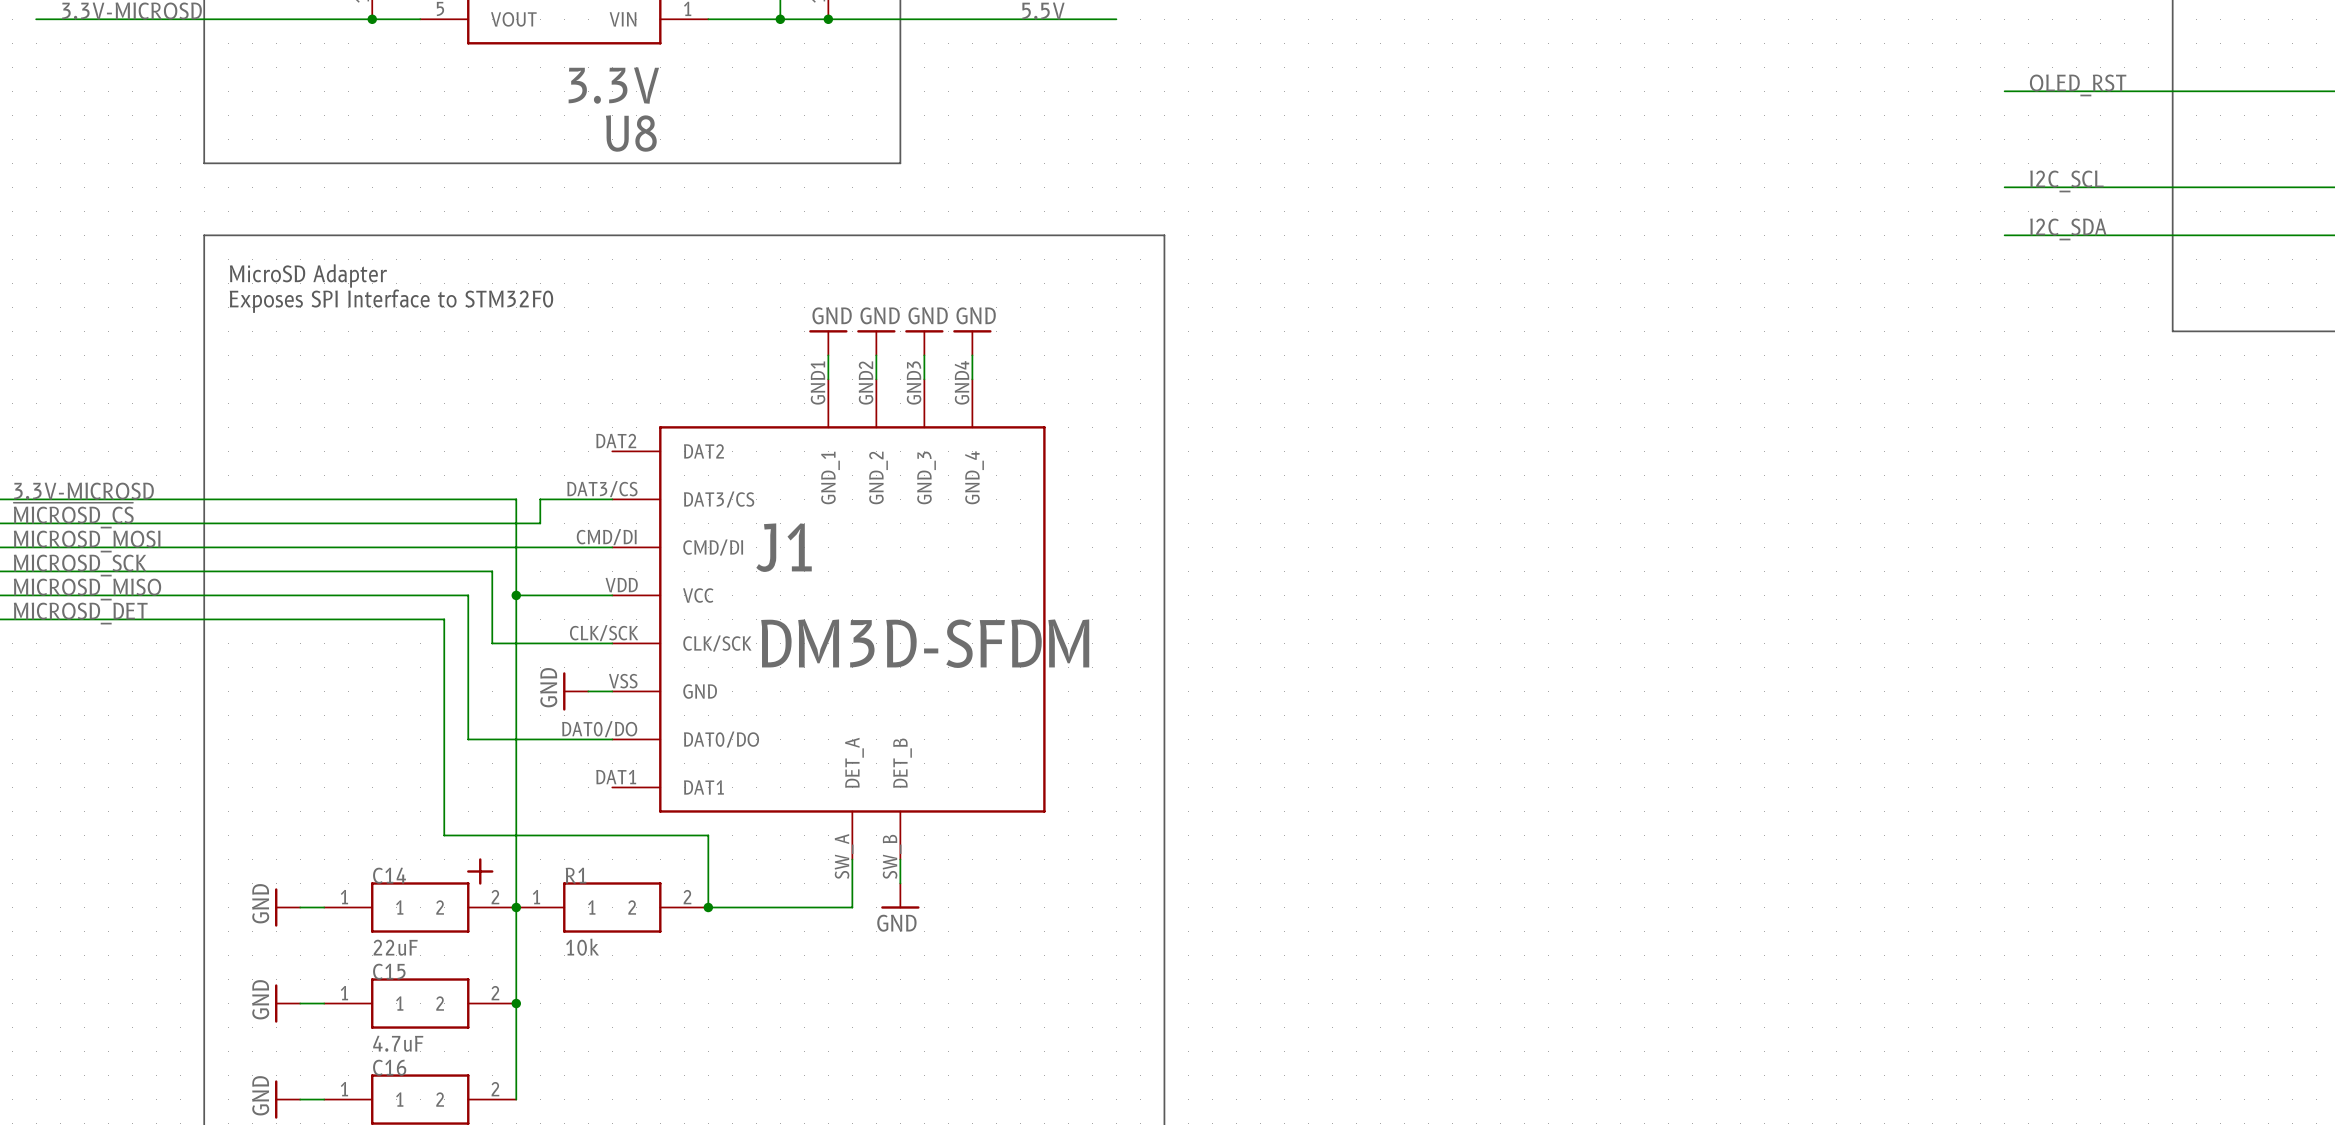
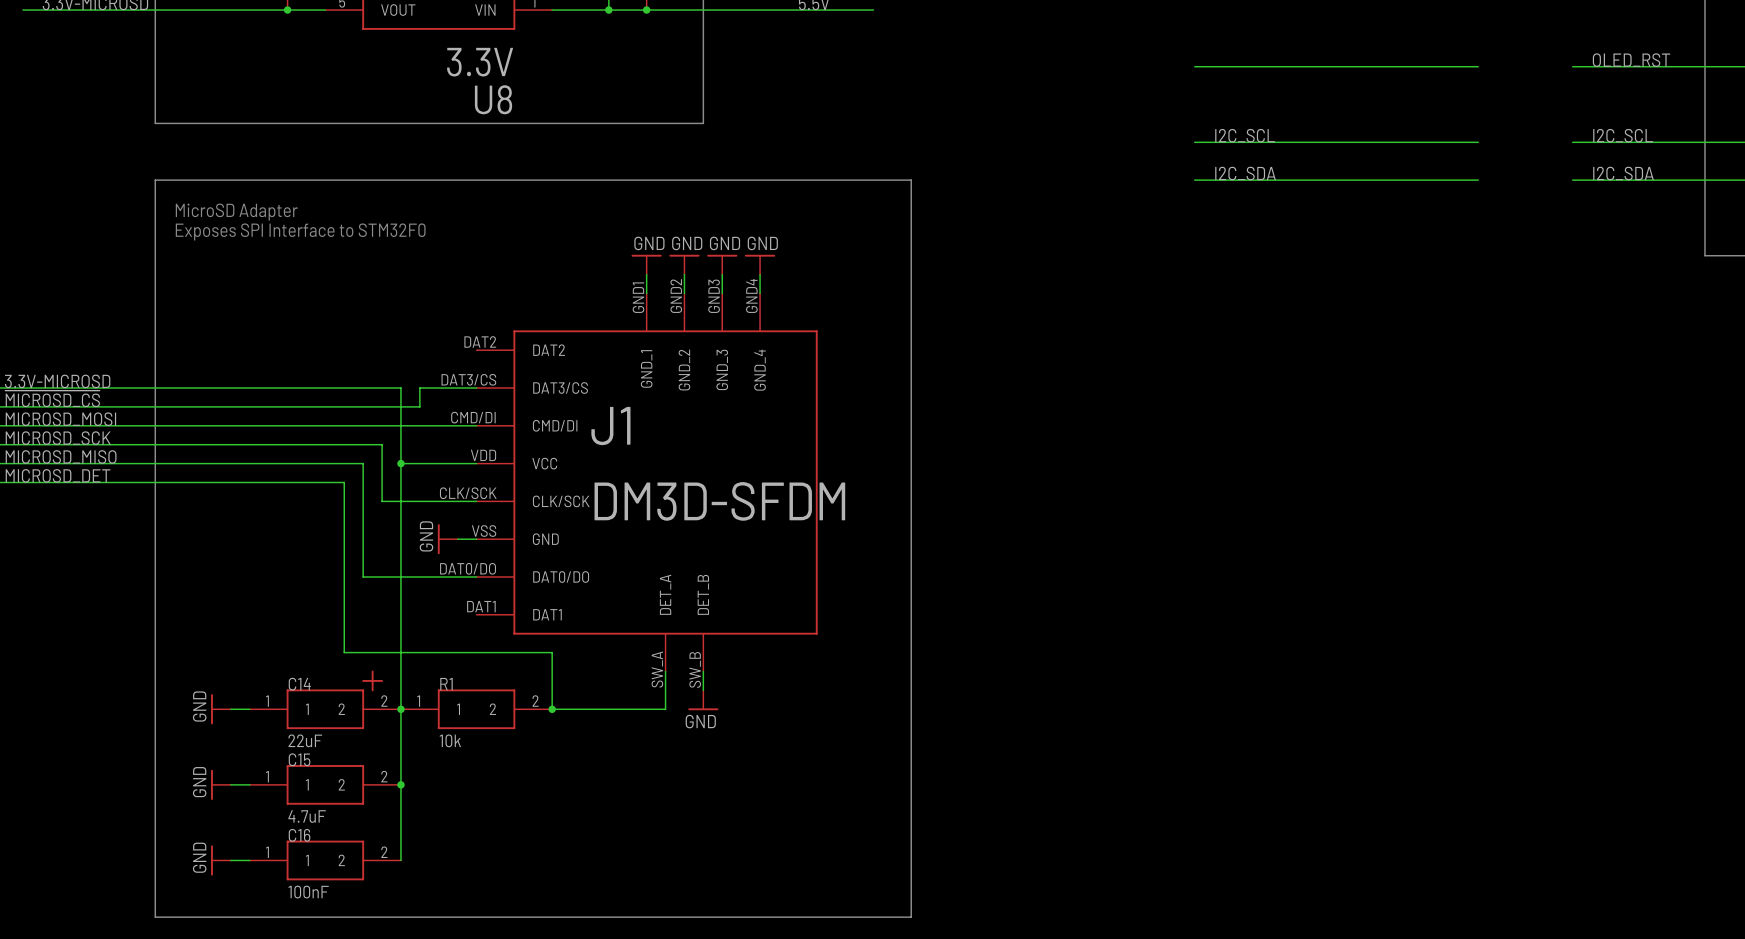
wire: none -> (1194, 66) (1478, 66)
label: none -> I2C_SCL (1245, 135)
wire: none -> (1194, 142) (1478, 142)
label: none -> I2C_SDA (1245, 173)
wire: none -> (1194, 180) (1478, 180)

